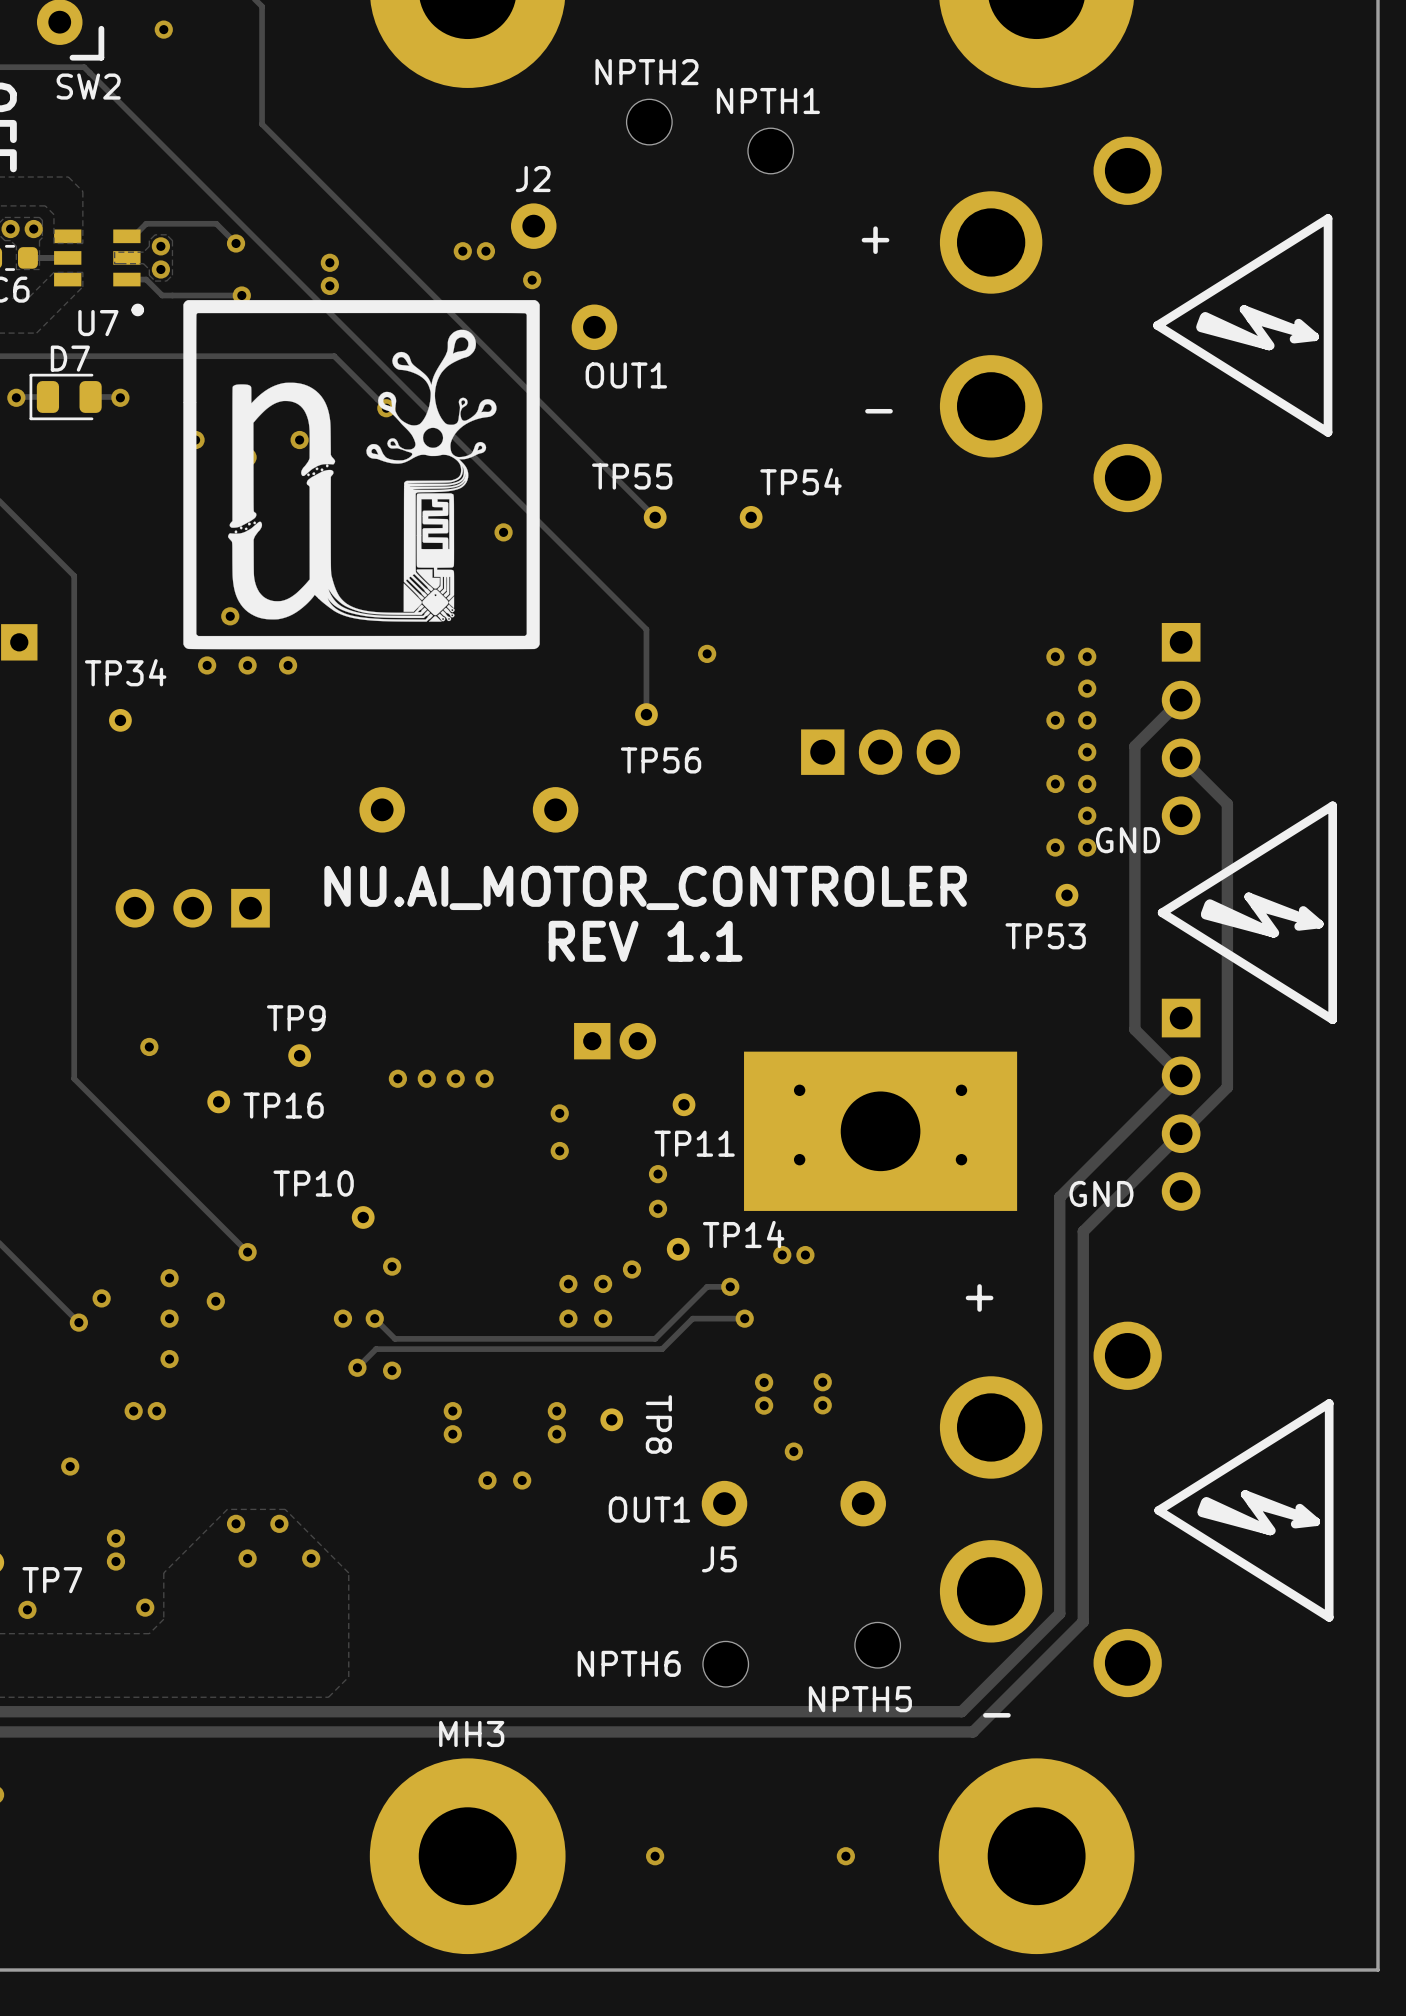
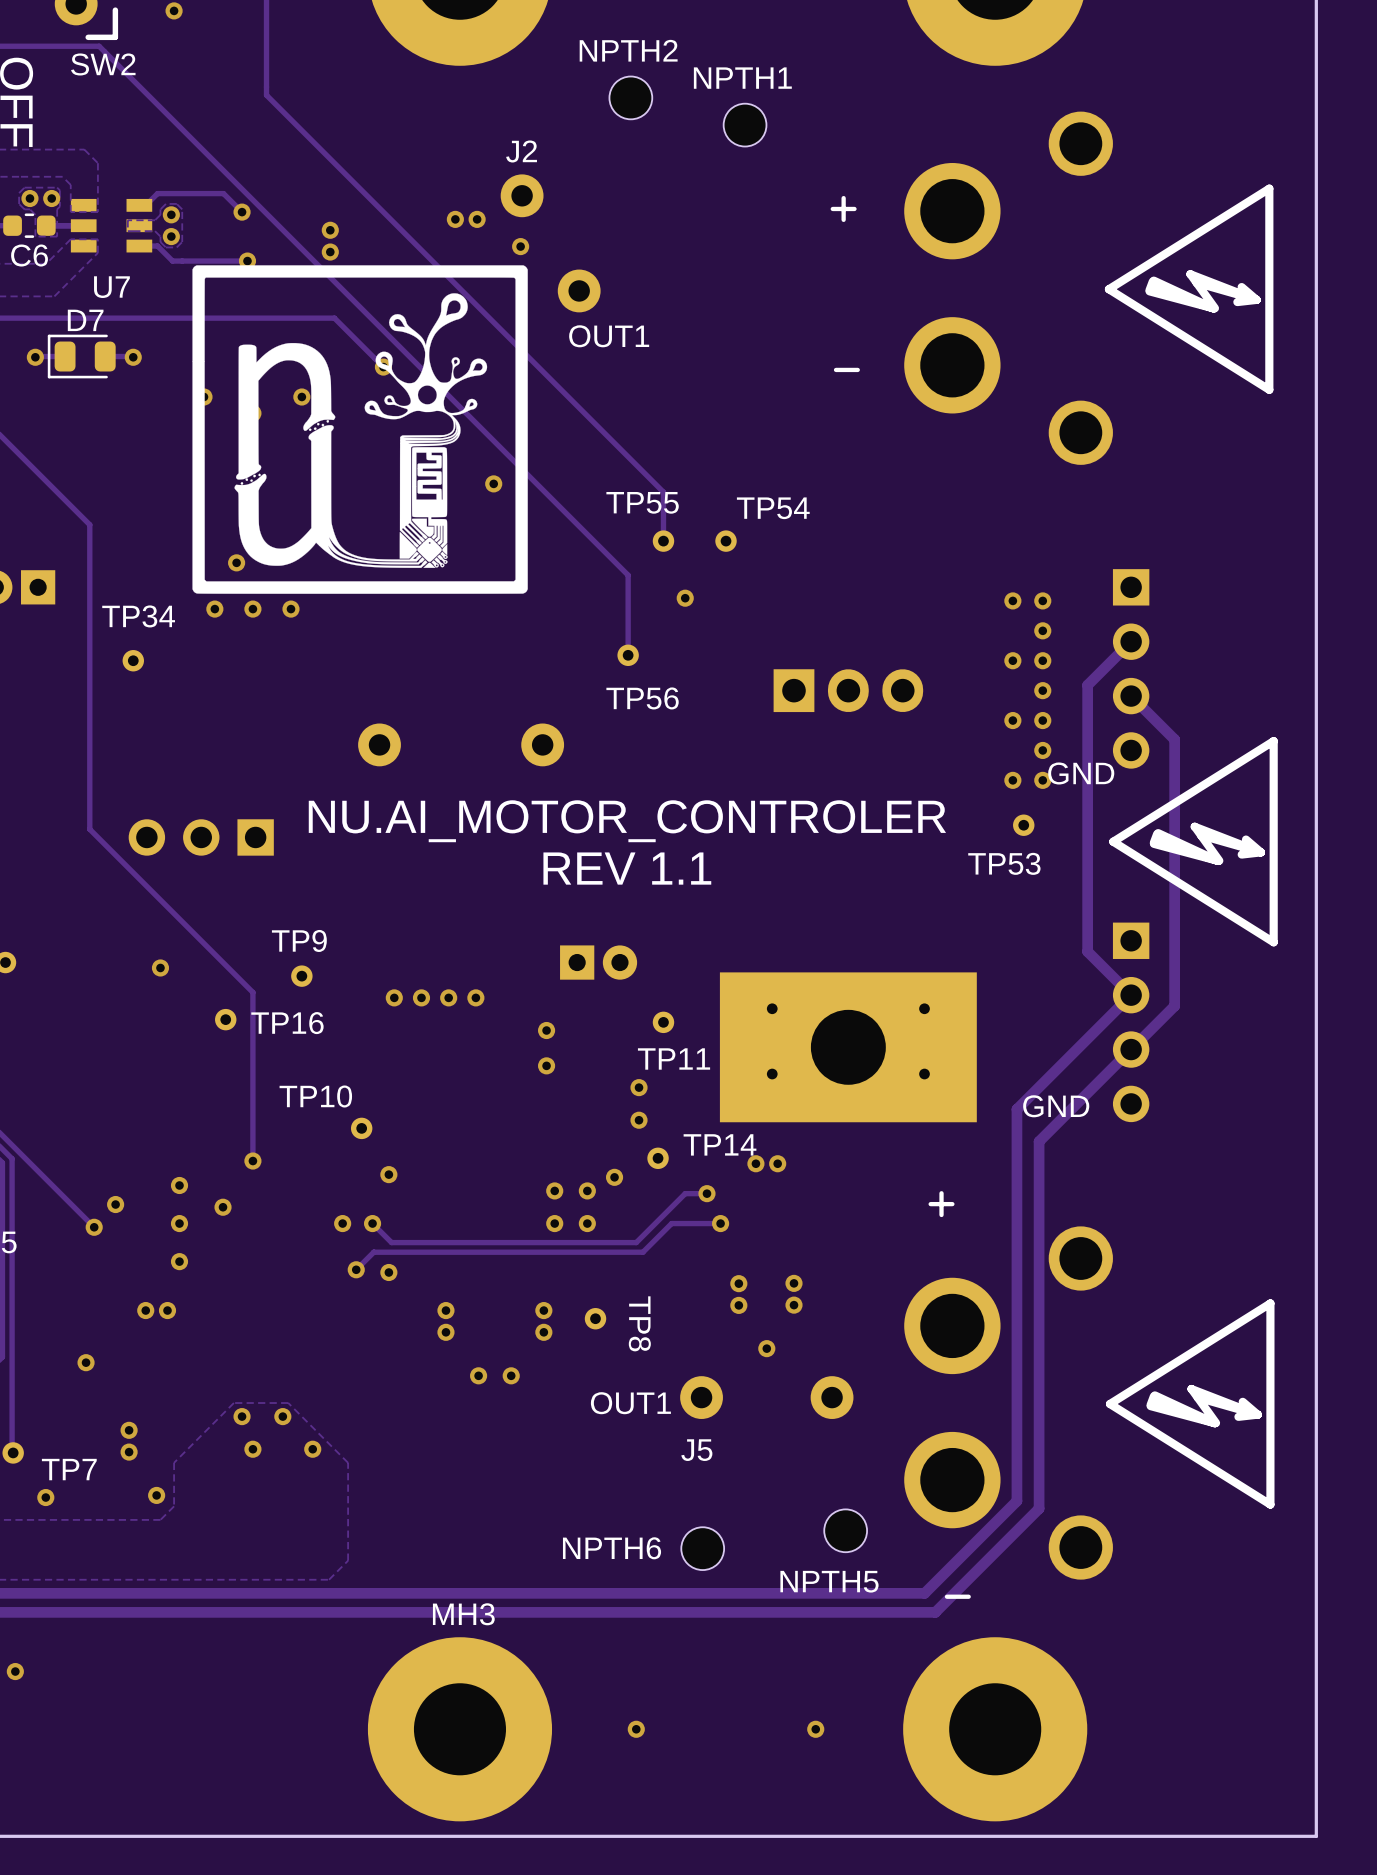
track: (262, 119) (262, 124) (655, 517) -> (266, 95) (663, 492) (663, 541)
U7 footprint: [54, 229, 145, 317] -> [70, 198, 153, 253]
TP55 position: (655, 517) -> (663, 541)
TP54 position: (751, 517) -> (726, 541)
track: (74, 899) (74, 1078) (247, 1252) -> (89, 829) (252, 992) (252, 1161)

